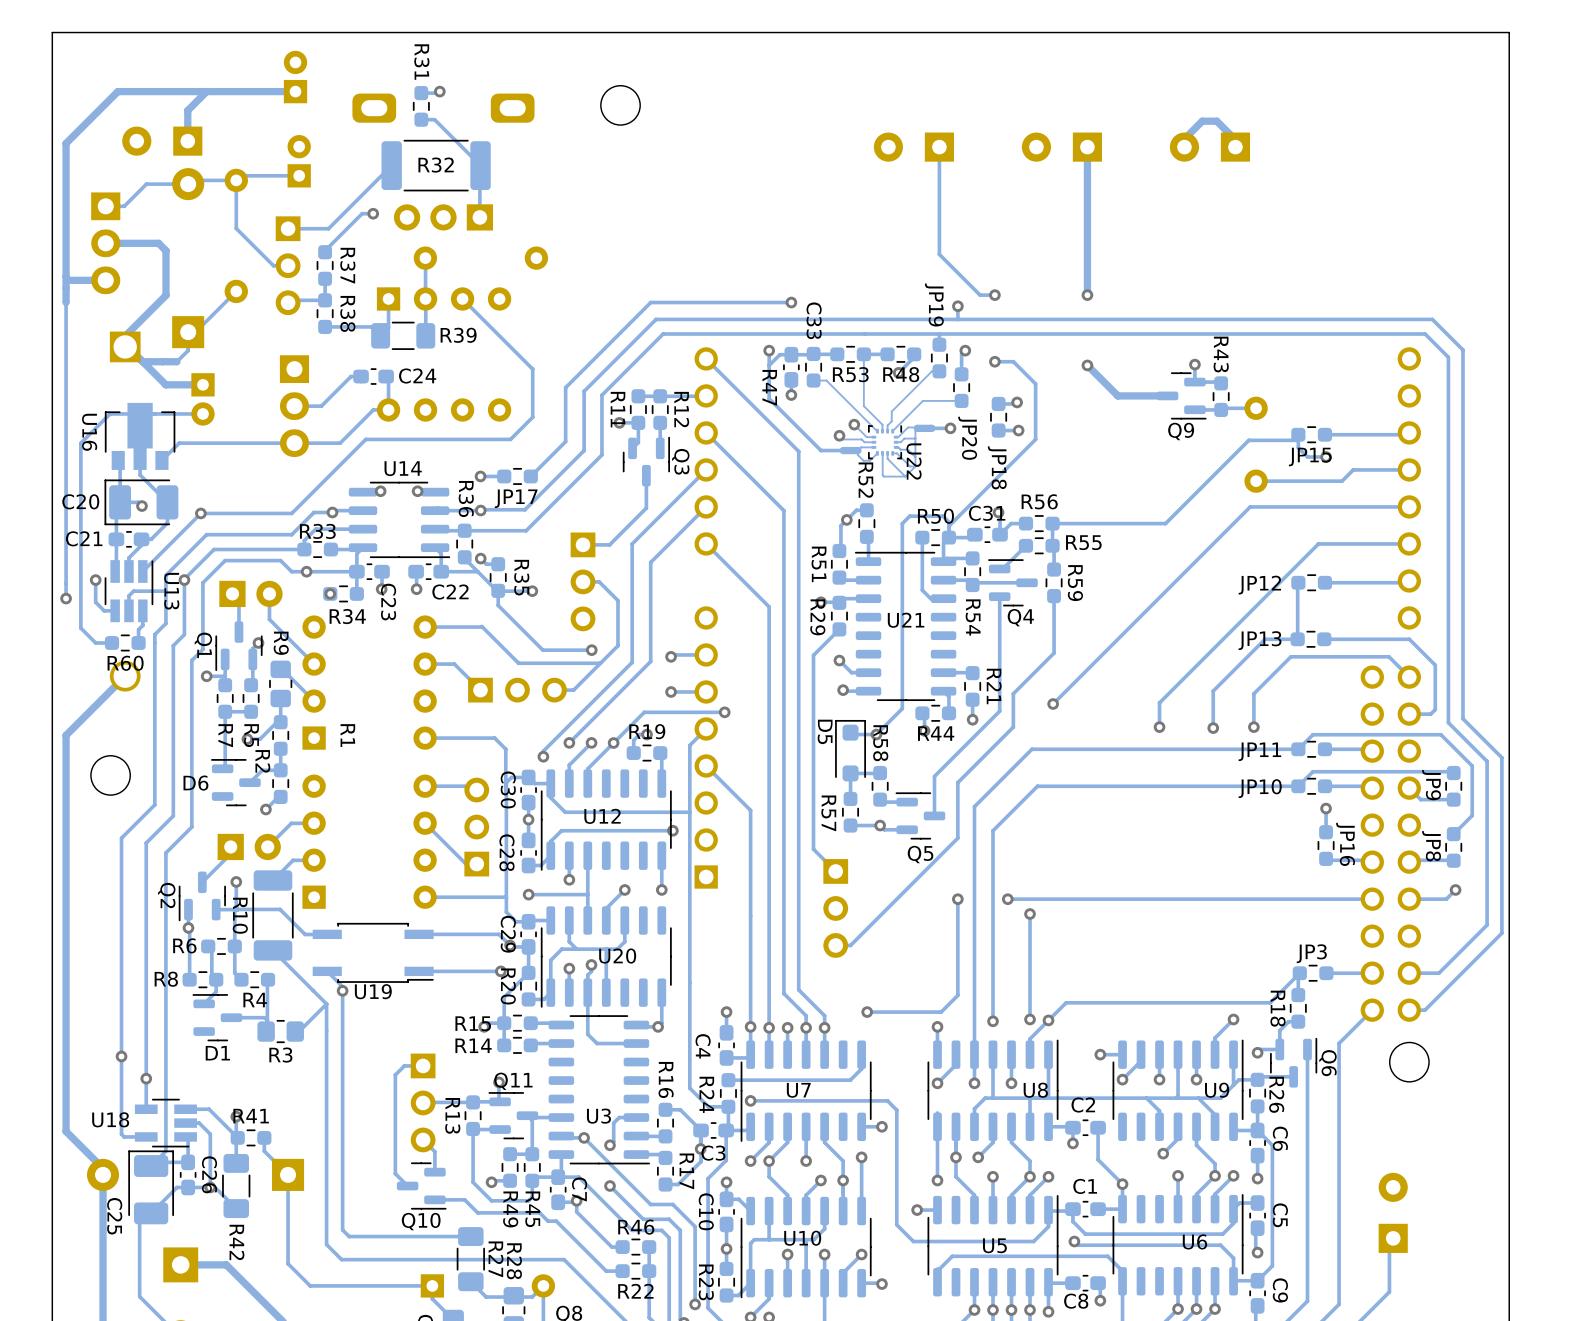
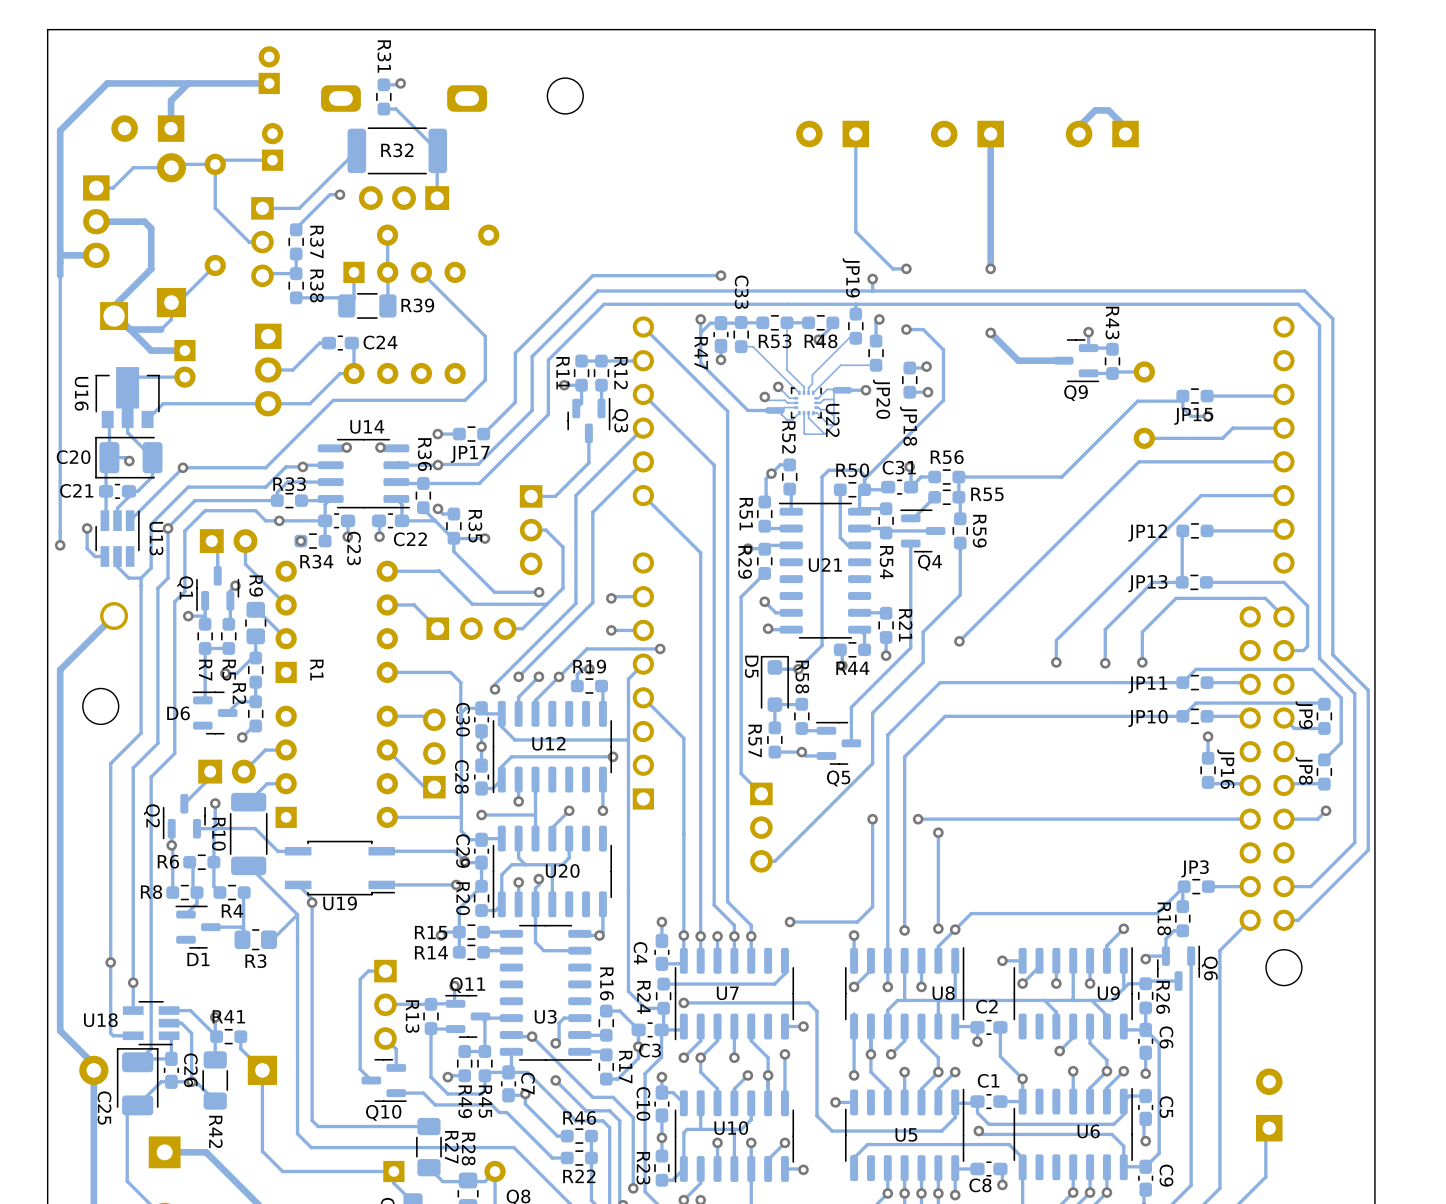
track: (150, 413) (110, 413) (80, 443) (80, 628) (95, 642) (111, 642) -> none
track: (165, 591) (133, 591) (128, 595) (128, 610) -> (141, 578) (128, 578) (117, 566) (117, 556)
track: (142, 610) (142, 625) (138, 629) (138, 642) -> none
R60: (125, 642) -> none

